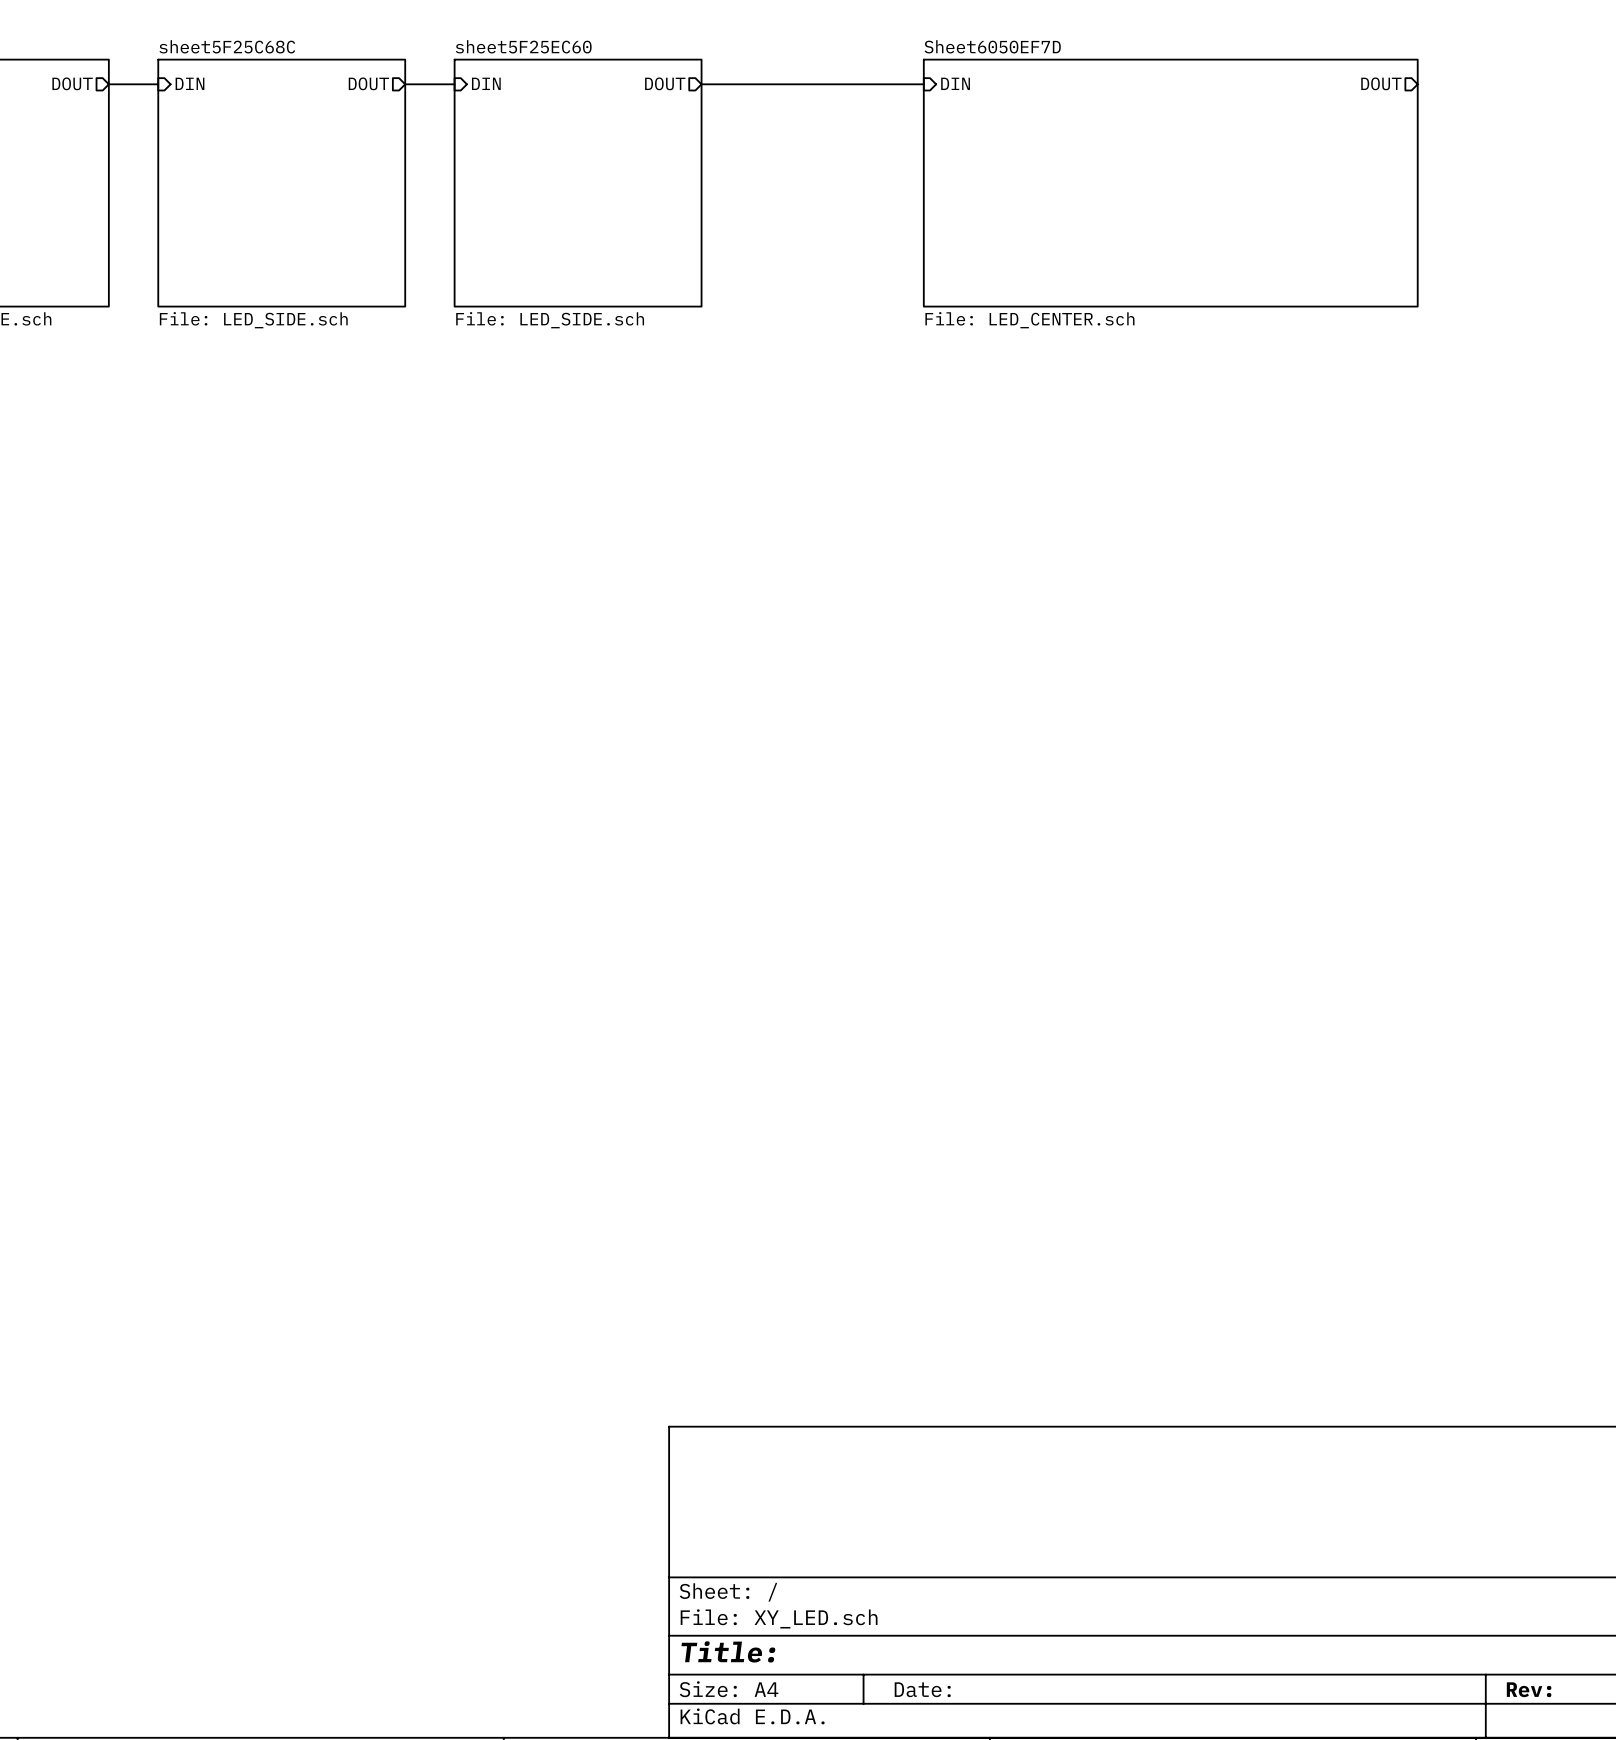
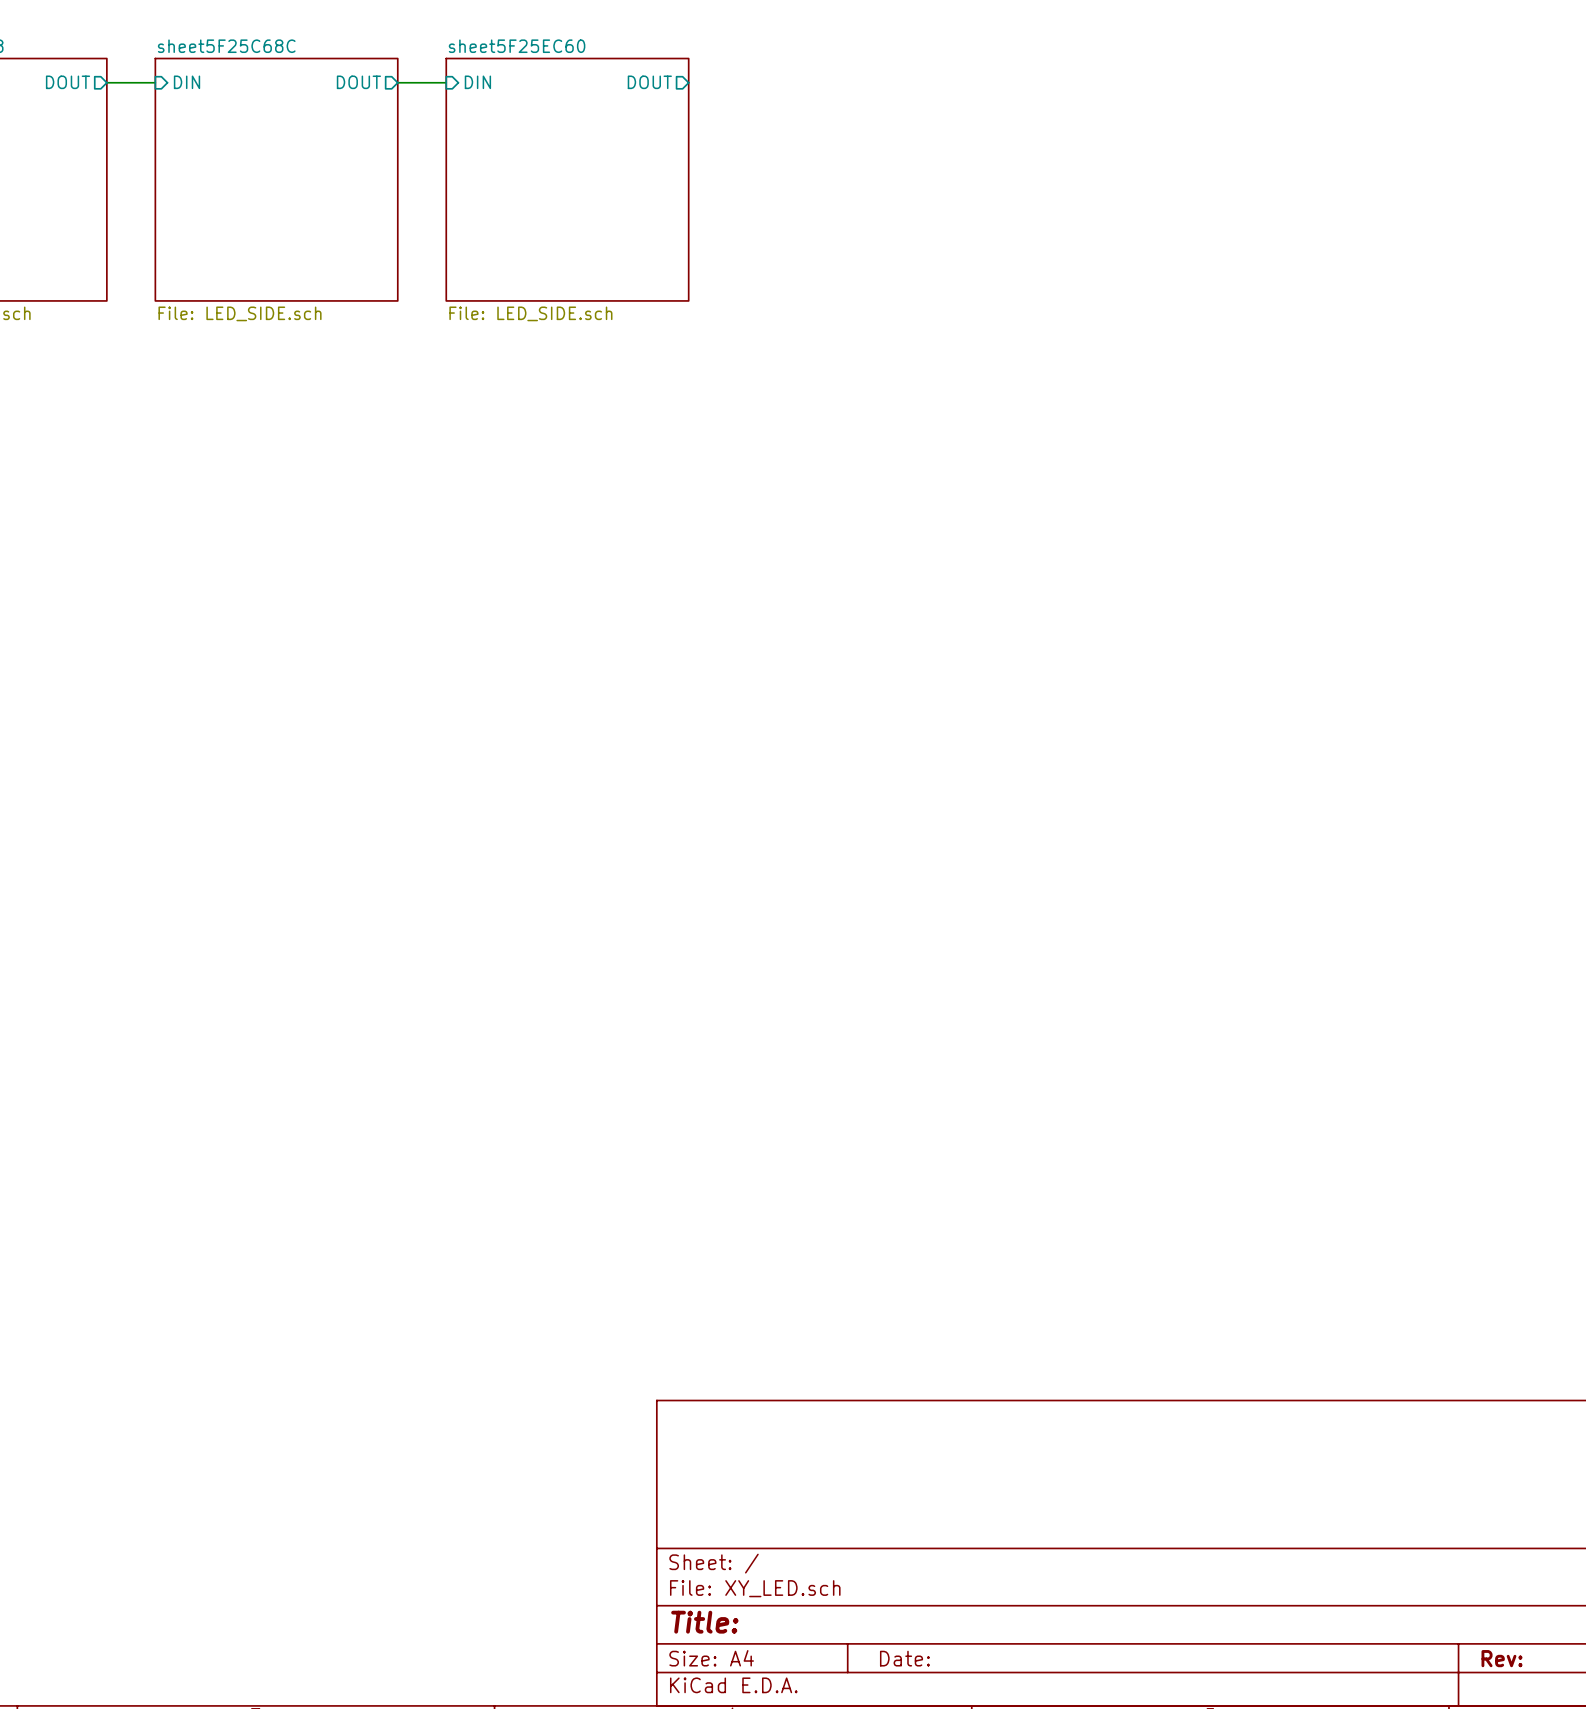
sheet pin: DIN (955, 83) -> none
sheet pin: DOUT (1381, 83) -> none
wire: (701, 84) (923, 84) -> none
sheet Sheet6050EF7D: File: LED_CENTER.sch (1170, 183) -> none

